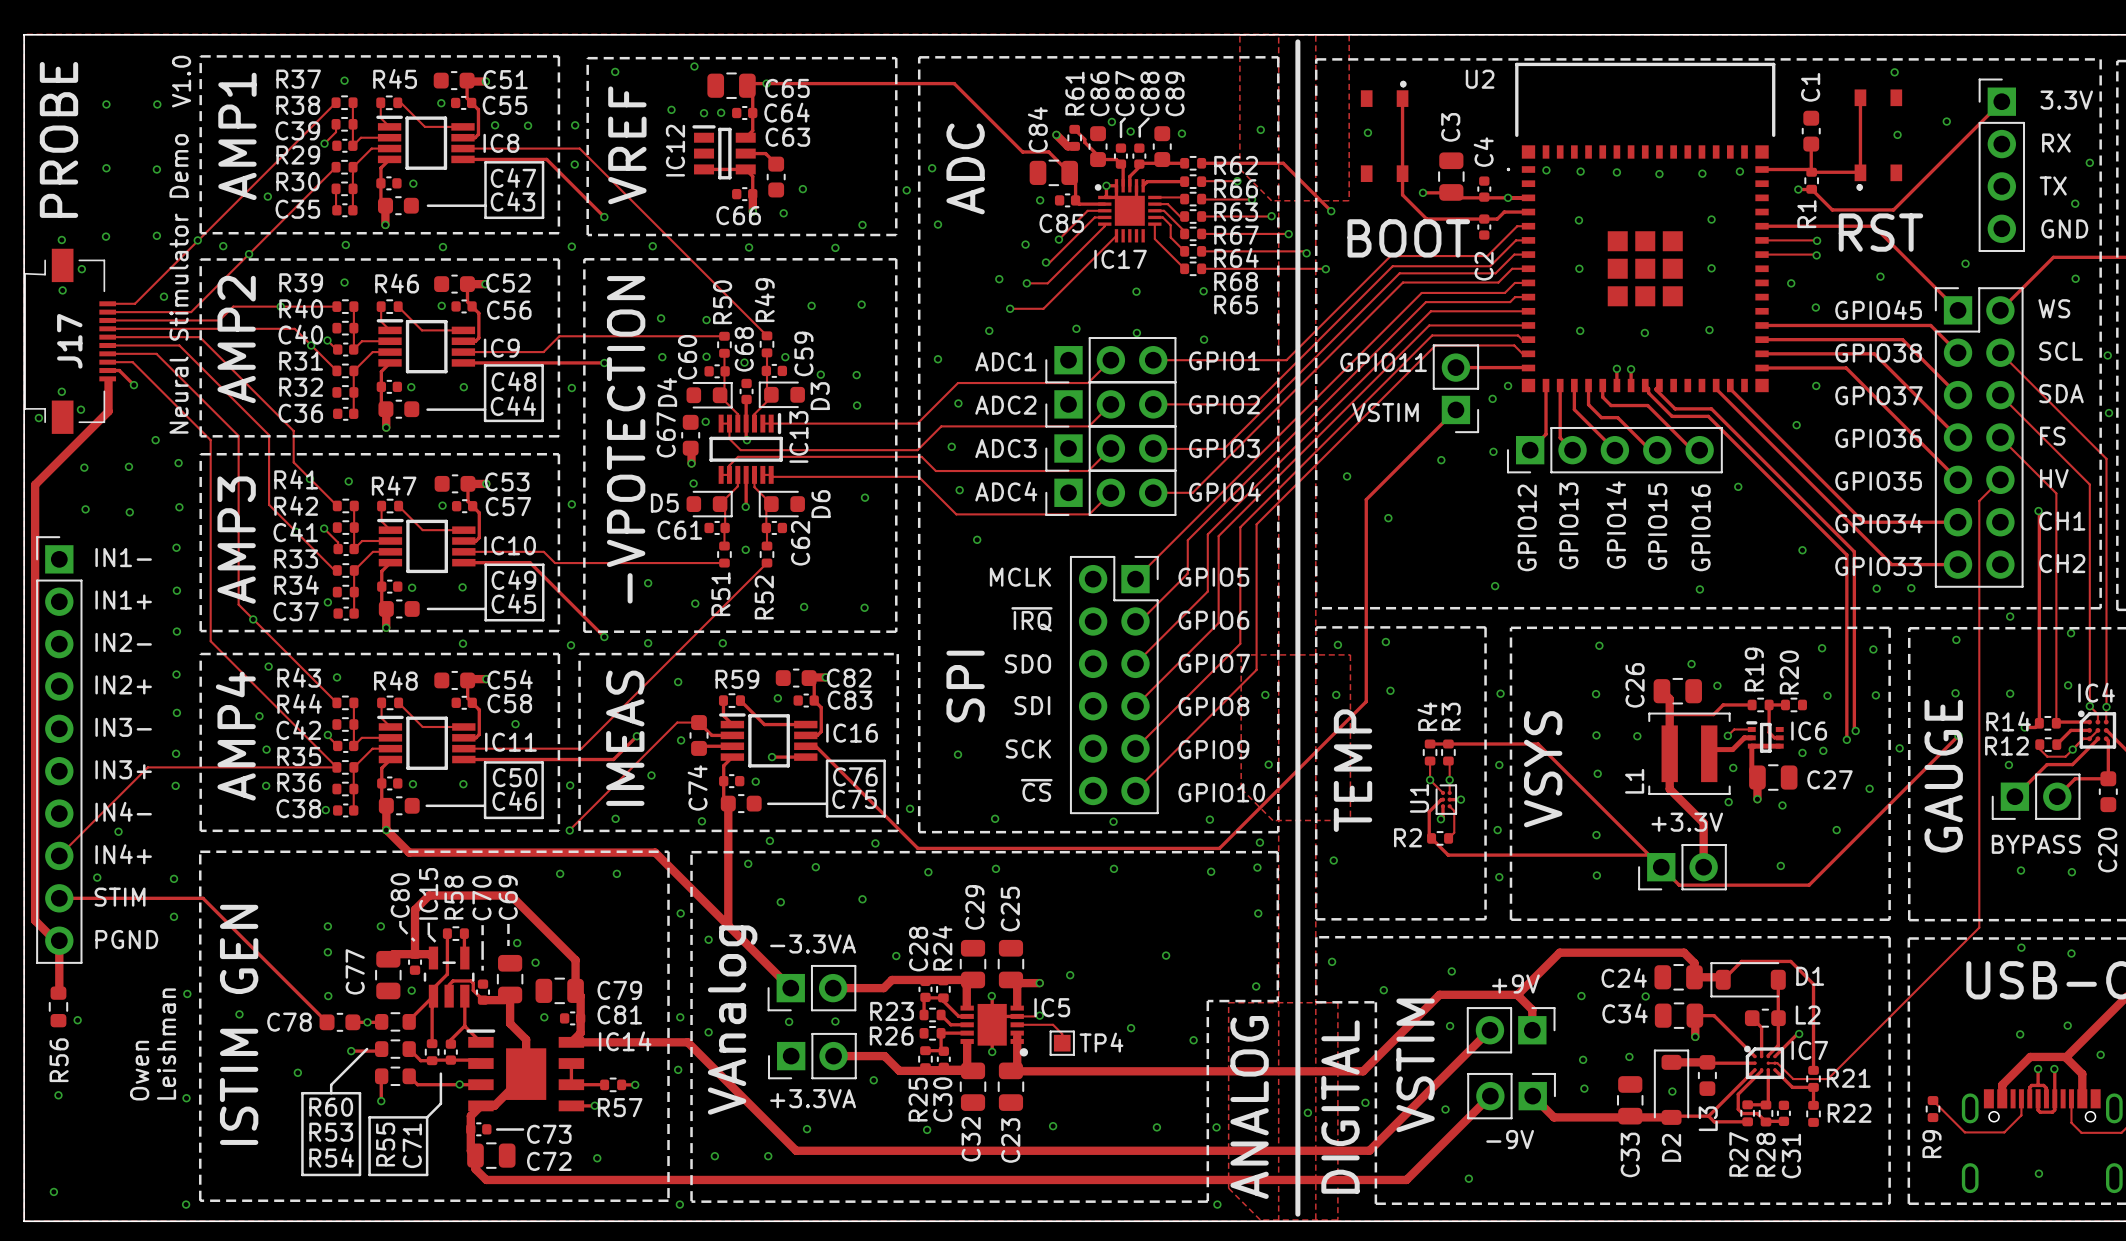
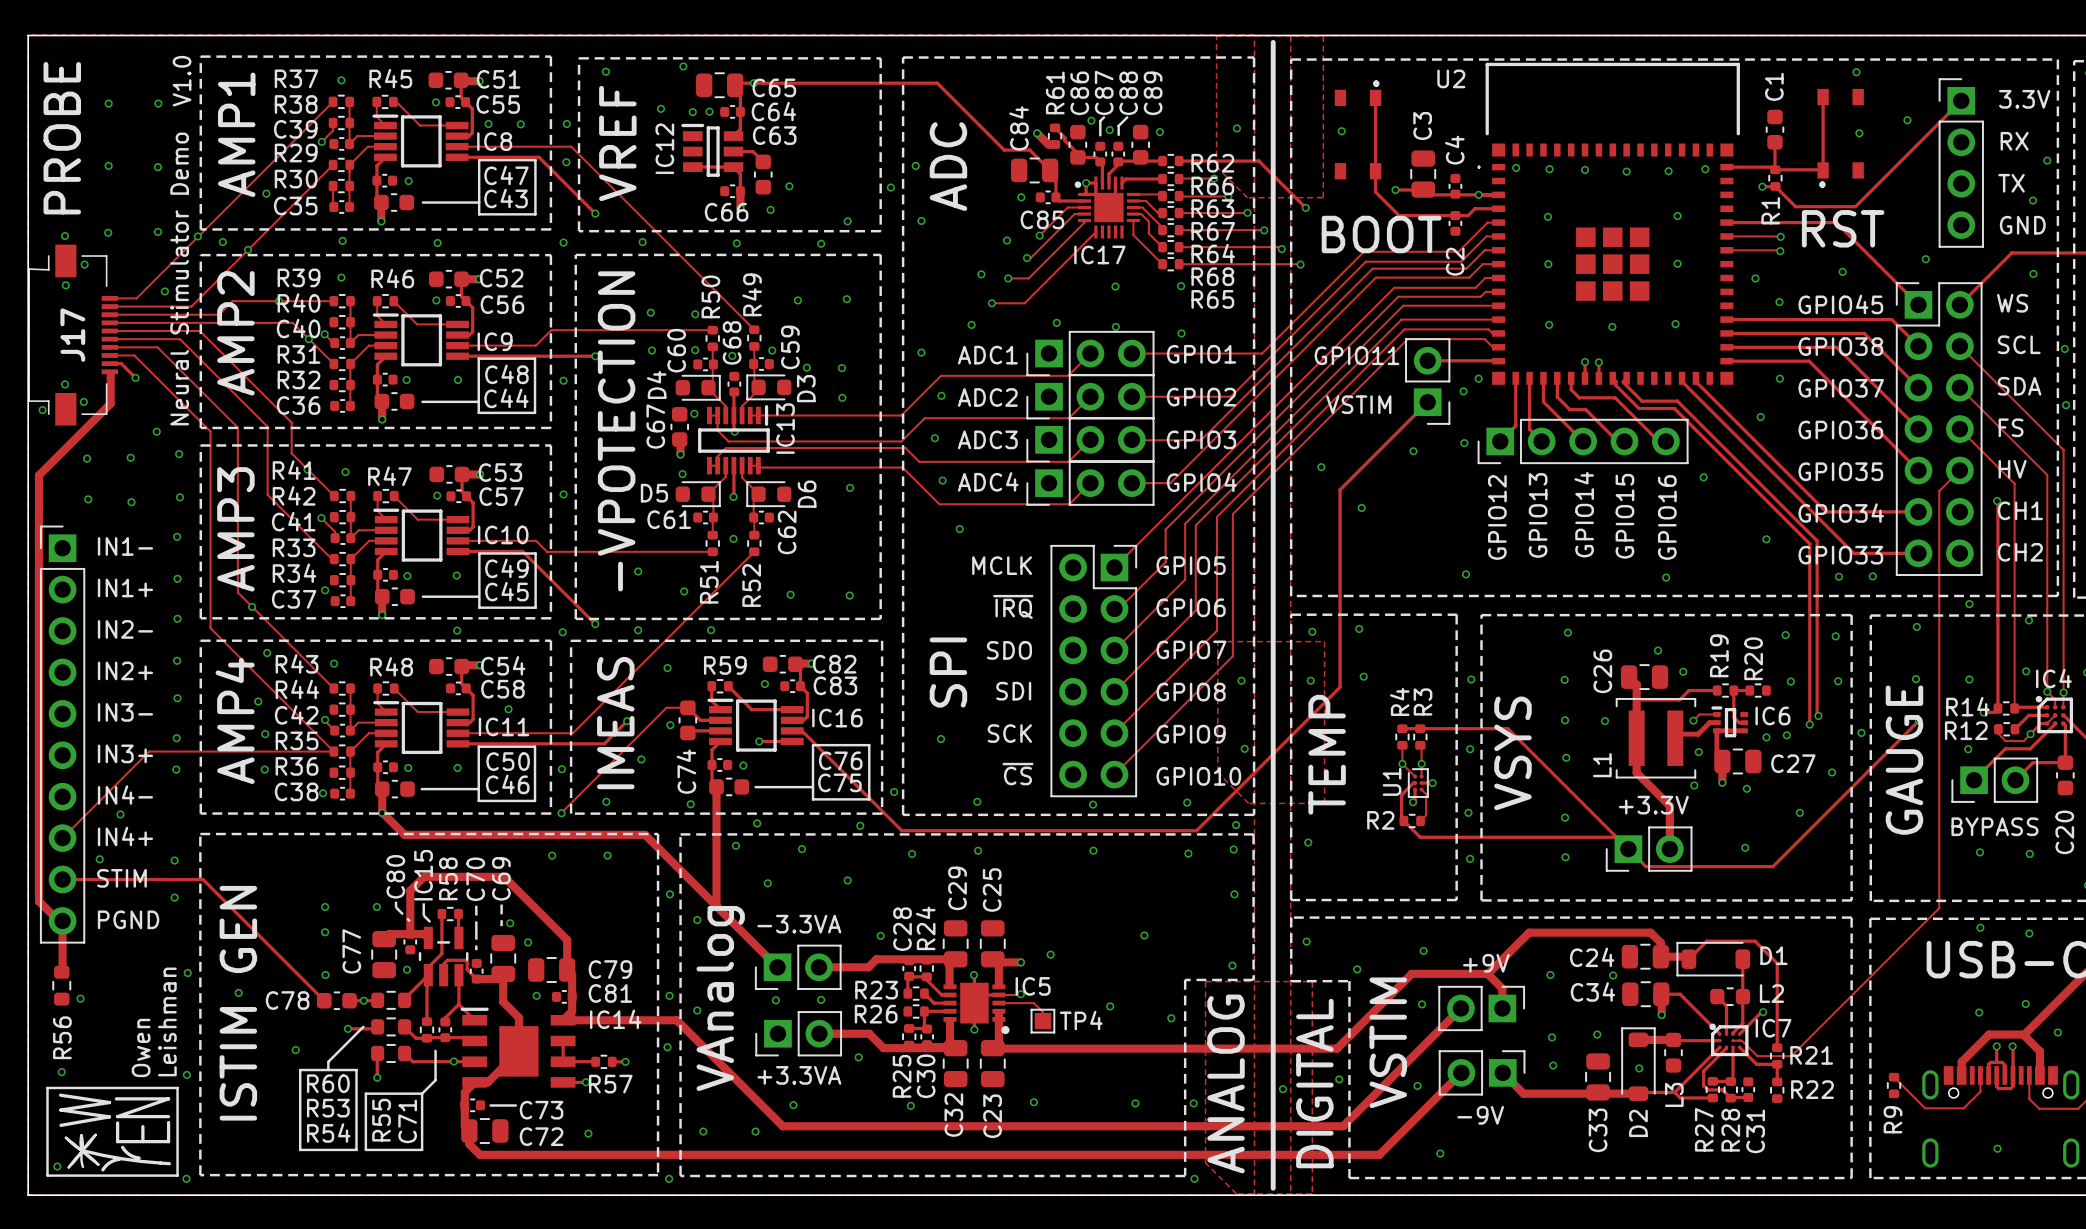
line: none -> (47, 1087) (47, 1175) (177, 1175) (177, 1087) (47, 1087)
line: none -> (60, 1095) (109, 1102) (60, 1110) (109, 1116) (60, 1125)
line: none -> (116, 1098) (168, 1098) (117, 1116) (168, 1116)
line: none -> (168, 1122) (168, 1141) (117, 1141) (117, 1122)
line: none -> (142, 1126) (142, 1141)
line: none -> (122, 1147) (129, 1154) (139, 1158)
line: none -> (82, 1151) (86, 1154) (90, 1157) (98, 1164) (89, 1158) (82, 1151)
line: none -> (82, 1151) (75, 1158) (68, 1167) (75, 1159) (79, 1155) (82, 1151)
line: none -> (82, 1151) (81, 1135) (82, 1151)
line: none -> (82, 1151) (77, 1148) (73, 1144) (65, 1137) (74, 1144) (82, 1151)
line: none -> (82, 1151) (89, 1143) (95, 1134) (88, 1142) (85, 1146) (82, 1151)
line: none -> (82, 1151) (82, 1166)
line: none -> (84, 1150) (122, 1158) (169, 1163)
line: none -> (119, 1159) (109, 1162) (102, 1169)

